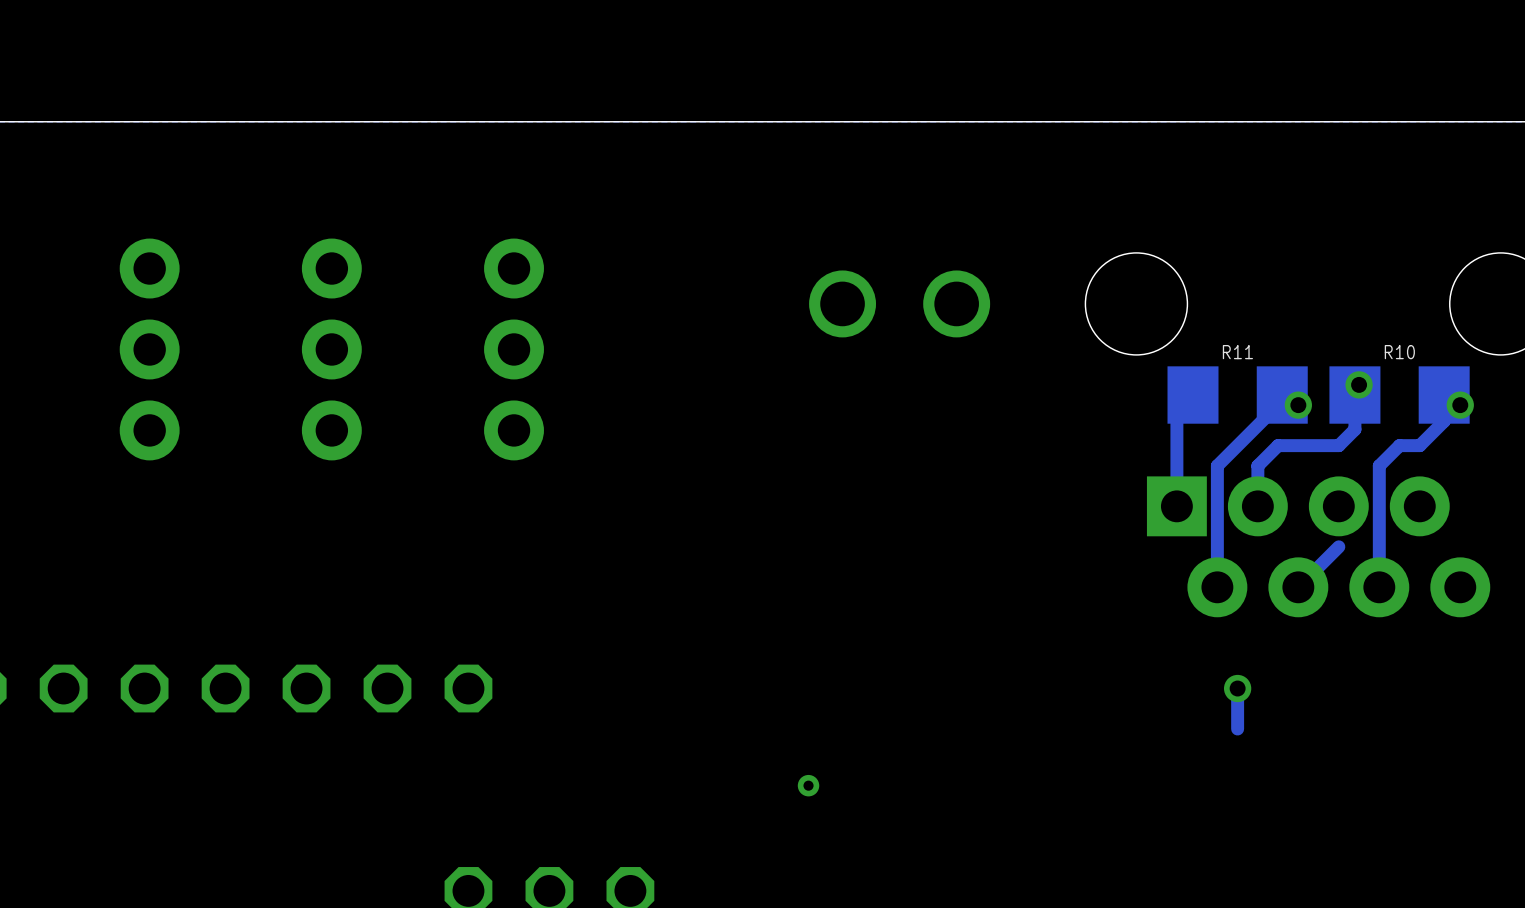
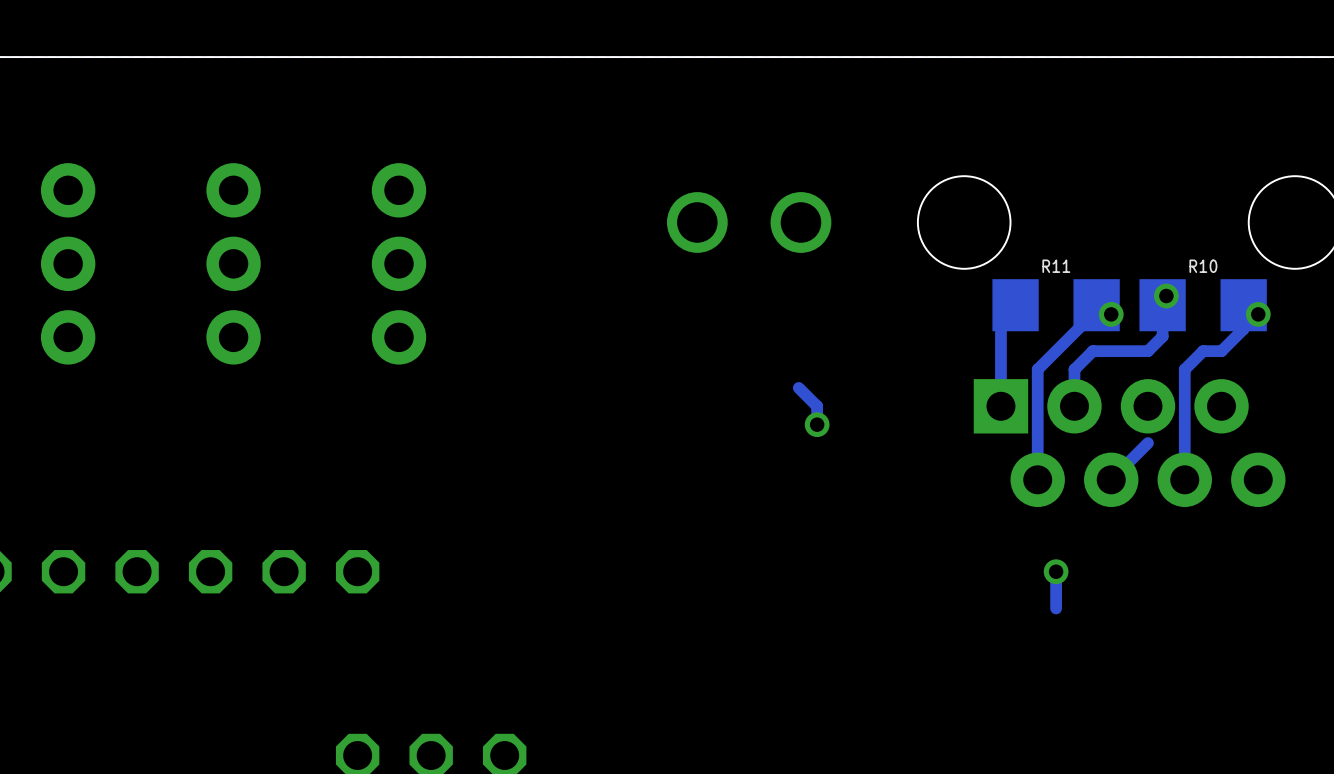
track: none -> (798, 387) (817, 406) (817, 424)
via: none -> (817, 424)
via: (808, 785) -> none

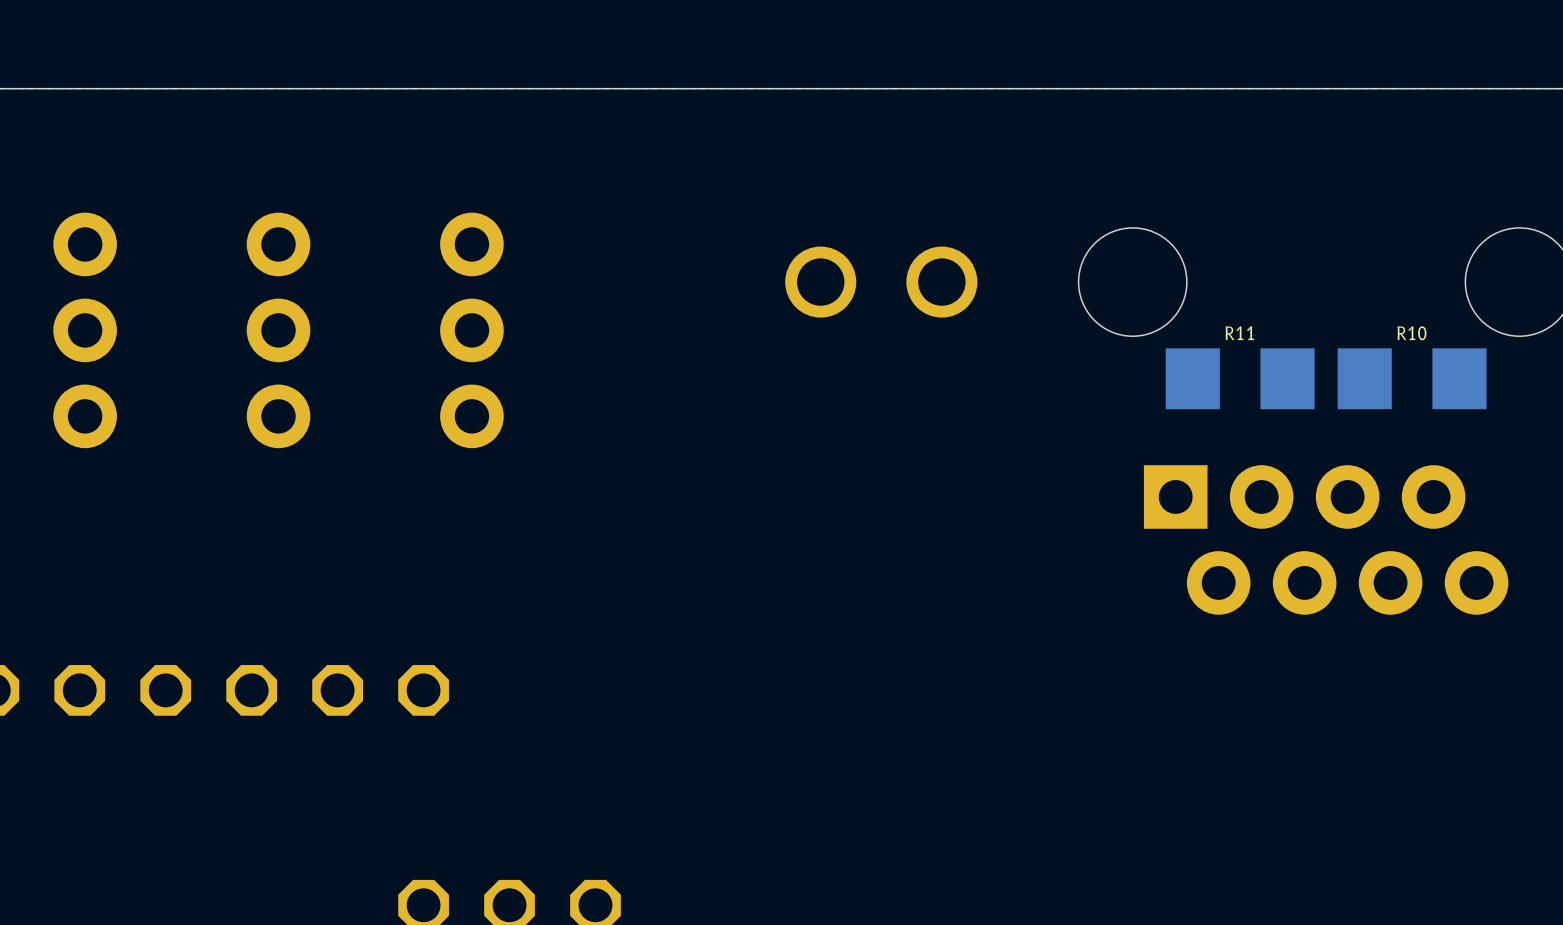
track: (1166, 296) (1166, 301) (1162, 305) (1162, 336) (1148, 351) (1092, 351) (1074, 369) (1074, 406) -> none
via: (1166, 296) -> none
track: (1015, 305) (1000, 319) (1000, 406) -> none
track: (1111, 314) (1105, 314) (1096, 305) (1096, 310) (1037, 369) (1037, 479) -> none
via: (1111, 314) -> none
track: (1258, 314) (1252, 314) (1243, 305) (1243, 329) (1221, 351) (1203, 351) (1184, 369) (1184, 479) -> none
via: (1258, 314) -> none
track: (798, 387) (817, 406) (817, 424) -> none
via: (817, 424) -> none
track: (1148, 443) (1111, 479) -> none
track: (1056, 571) (1056, 608) -> none
via: (1056, 571) -> none

